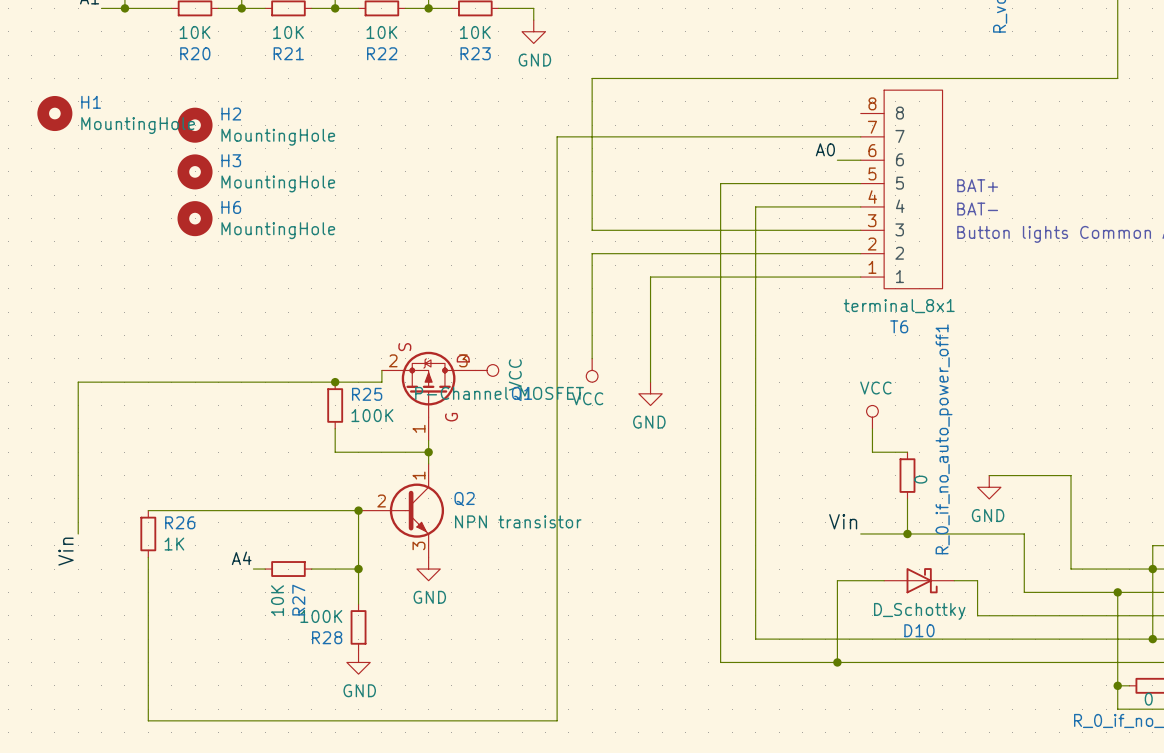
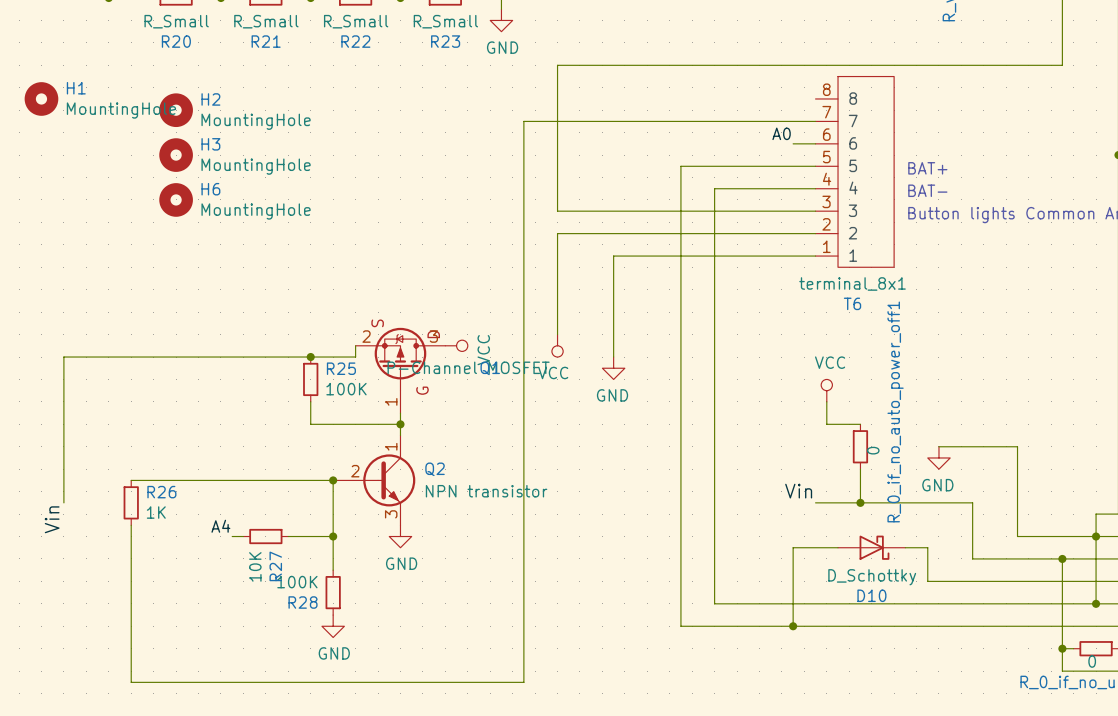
R20 value: 10K (195, 32) -> R_Small (176, 21)
R21 value: 10K (288, 32) -> R_Small (266, 21)
R22 value: 10K (381, 32) -> R_Small (356, 21)
R23 value: 10K (475, 32) -> R_Small (445, 21)

